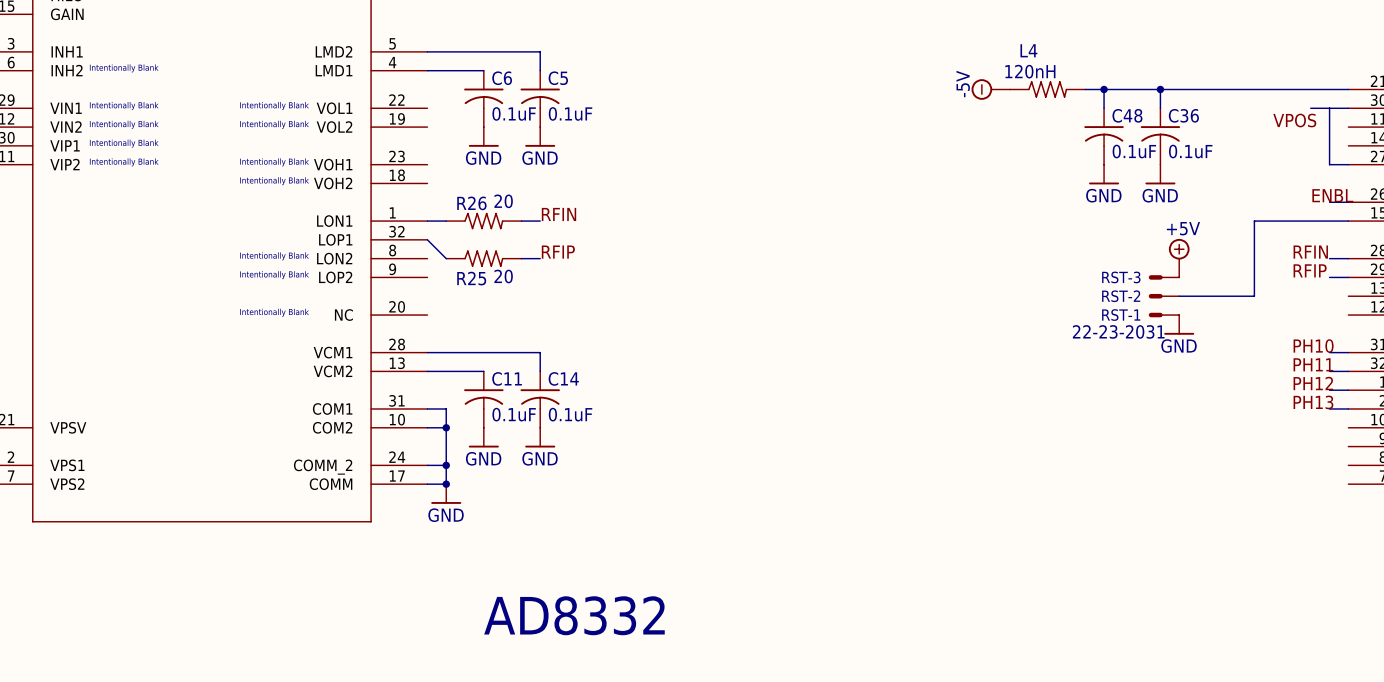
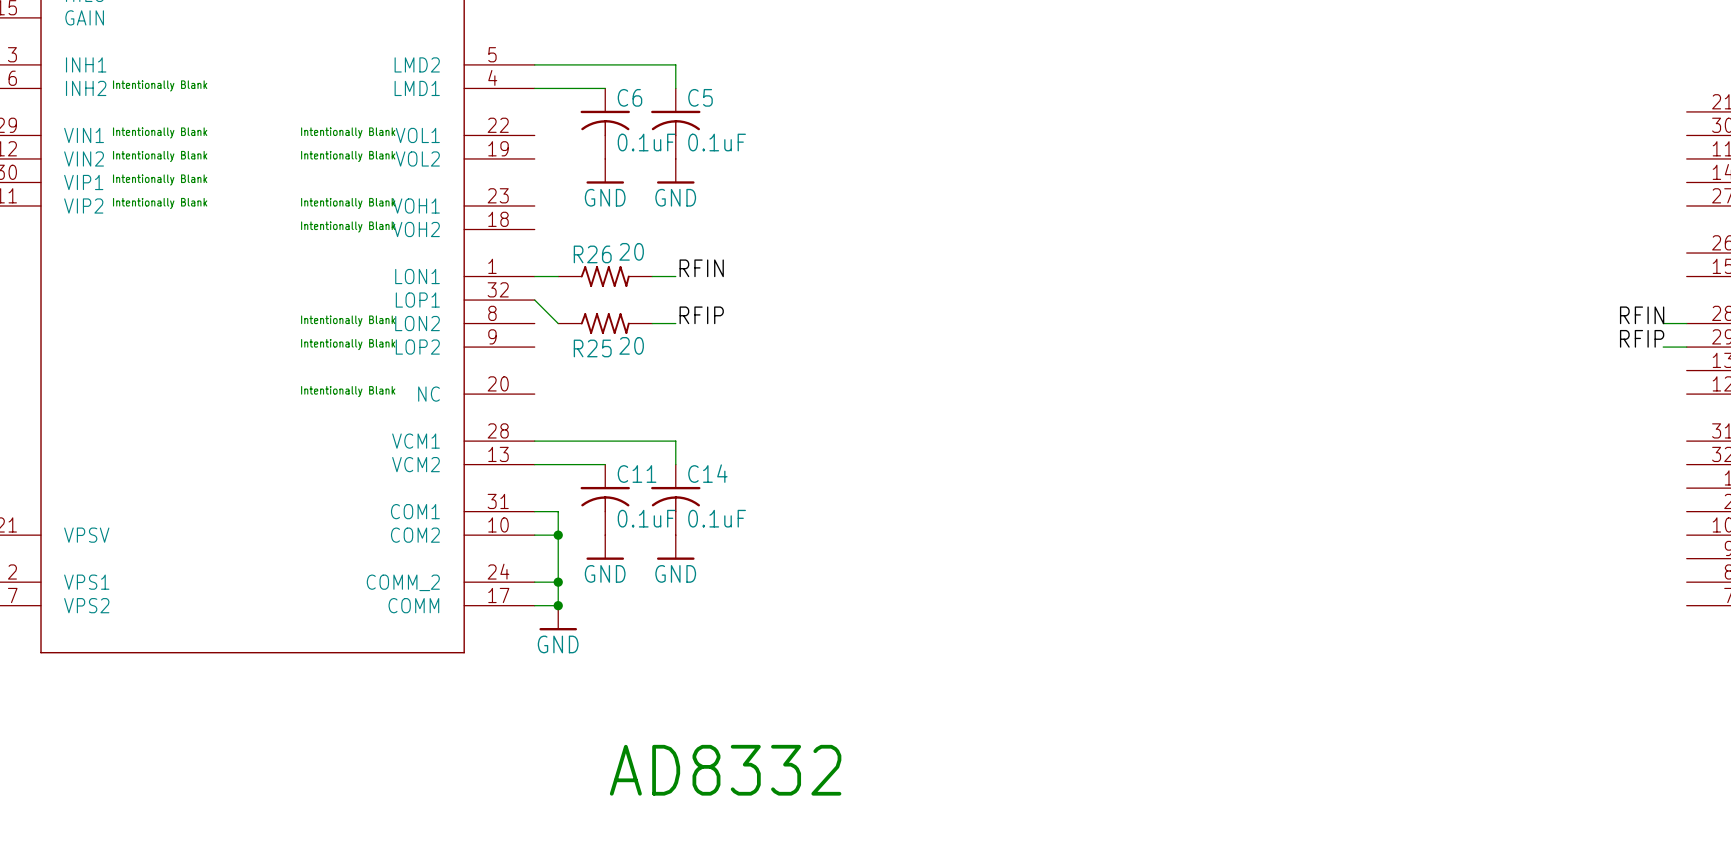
power symbol: -5V (990, 89) -> none
L4: 120nH (1047, 89) -> none
wire: (1085, 89) (1348, 89) -> none
wire: (1104, 89) (1104, 108) -> none
junction: (1104, 89) -> none
wire: (1160, 89) (1160, 108) -> none
junction: (1160, 89) -> none
wire: (1310, 108) (1348, 108) -> none
wire: (1329, 108) (1329, 164) (1348, 164) -> none
label: VPOS (1294, 120) -> none
C48: 0.1uF (1104, 136) -> none
C36: 0.1uF (1160, 136) -> none
power symbol: GND (1104, 174) -> none
power symbol: GND (1160, 174) -> none
label: ENBL (1332, 195) -> none
wire: (1329, 202) (1348, 202) -> none
wire: (1348, 221) (1254, 221) (1254, 296) (1179, 296) -> none
power symbol: +5V (1179, 258) -> none
RST-3: (1163, 277) -> none
RST-2: (1163, 296) -> none
RST-1: 22-23-2031 (1163, 315) -> none
power symbol: GND (1179, 324) -> none
label: PH10 (1313, 346) -> none
wire: (1329, 352) (1348, 352) -> none
label: PH11 (1313, 364) -> none
wire: (1329, 371) (1348, 371) -> none
label: PH12 (1313, 383) -> none
wire: (1329, 390) (1348, 390) -> none
label: PH13 (1313, 402) -> none
wire: (1329, 408) (1348, 408) -> none

